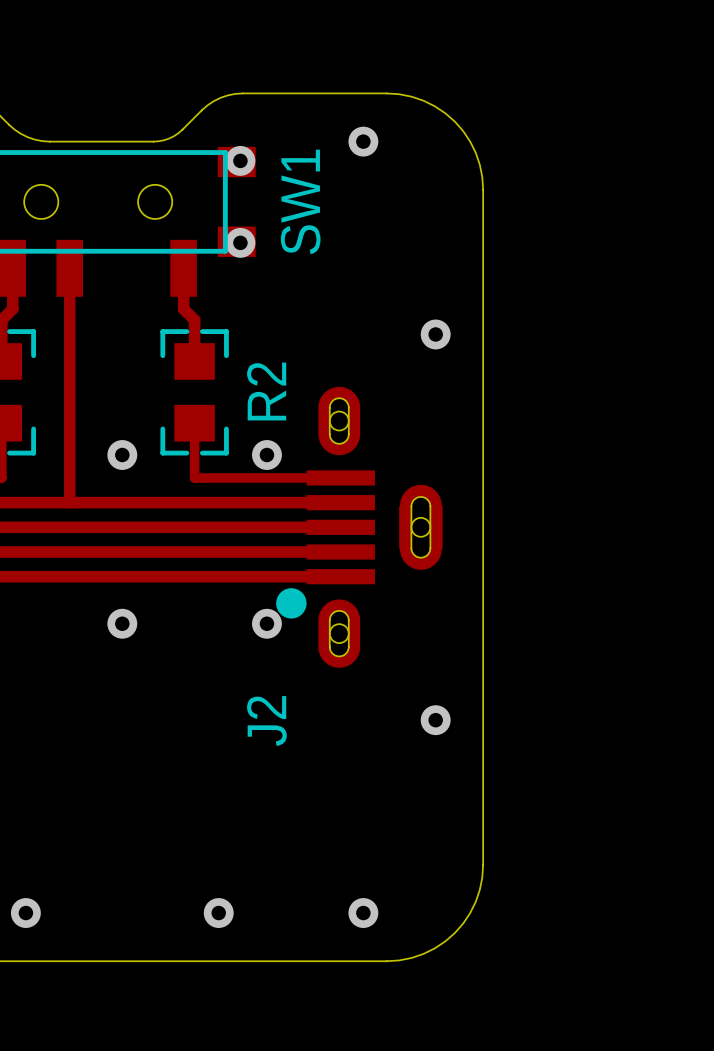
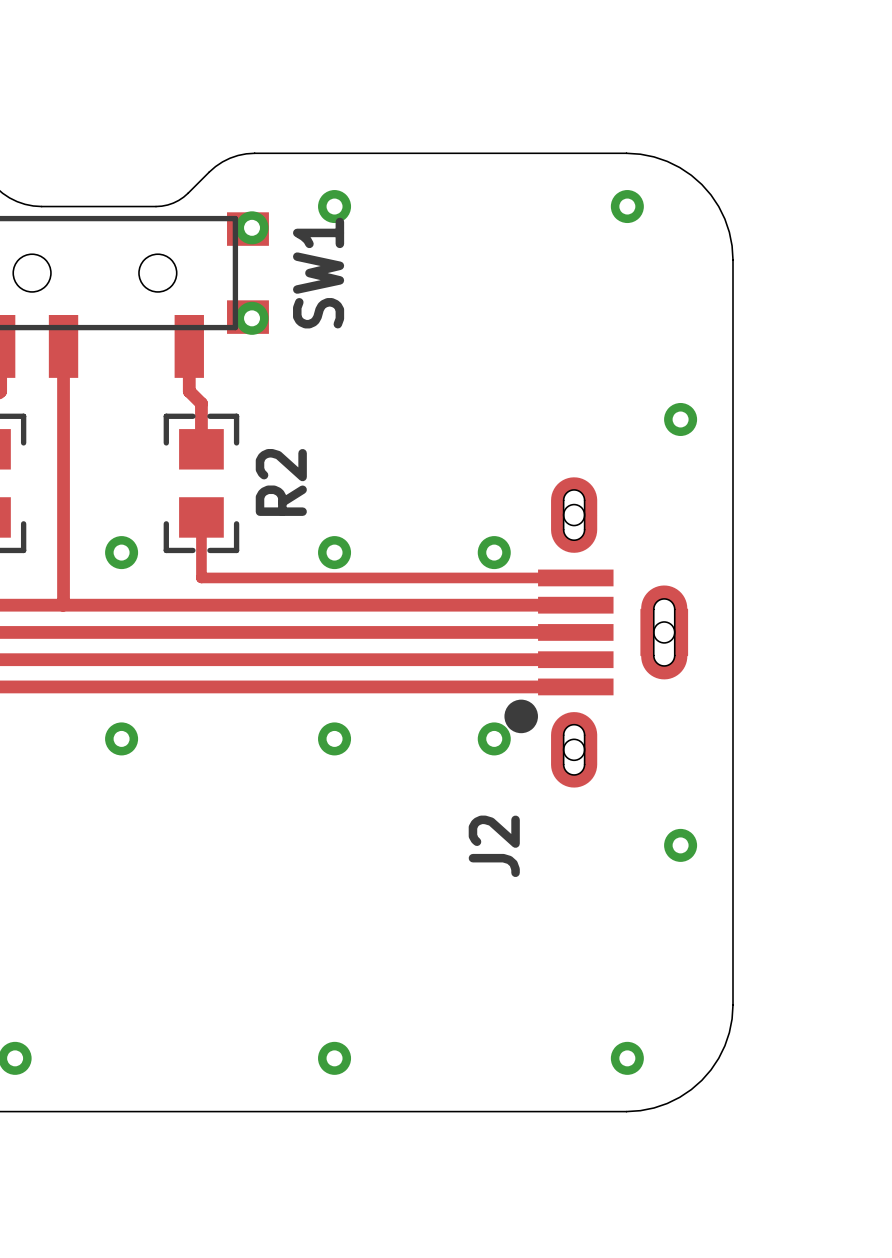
board edge: (386, 93) (411, 96) (423, 100) (445, 113) (454, 121) (463, 131) (475, 152) (479, 164) (483, 189) (482, 877) (475, 901) (463, 923) (454, 933) (445, 941) (423, 953) (411, 957) (386, 961) -> (413, 153) (626, 153) (654, 156) (667, 161) (691, 175) (710, 194) (724, 219) (729, 232) (732, 259) (732, 1005) (729, 1032) (724, 1045) (710, 1069) (701, 1080) (679, 1097) (654, 1107) (626, 1111) (413, 1111)
via position: (363, 141) -> (334, 206)
via: none -> (627, 206)
via: (435, 334) -> none
via: none -> (680, 419)
via position: (266, 455) -> (334, 552)
via: none -> (494, 552)
track: none -> (362, 577) (575, 577)
track: none -> (362, 605) (575, 605)
track: none -> (362, 632) (575, 632)
J2 position: (358, 527) -> (595, 632)
track: none -> (362, 659) (575, 659)
track: none -> (362, 686) (575, 686)
via position: (266, 623) -> (334, 738)
via: none -> (494, 738)
via: (435, 720) -> none
via: none -> (680, 845)
via: (218, 913) -> none
via: none -> (334, 1058)
via: (363, 913) -> none
via: none -> (627, 1058)

